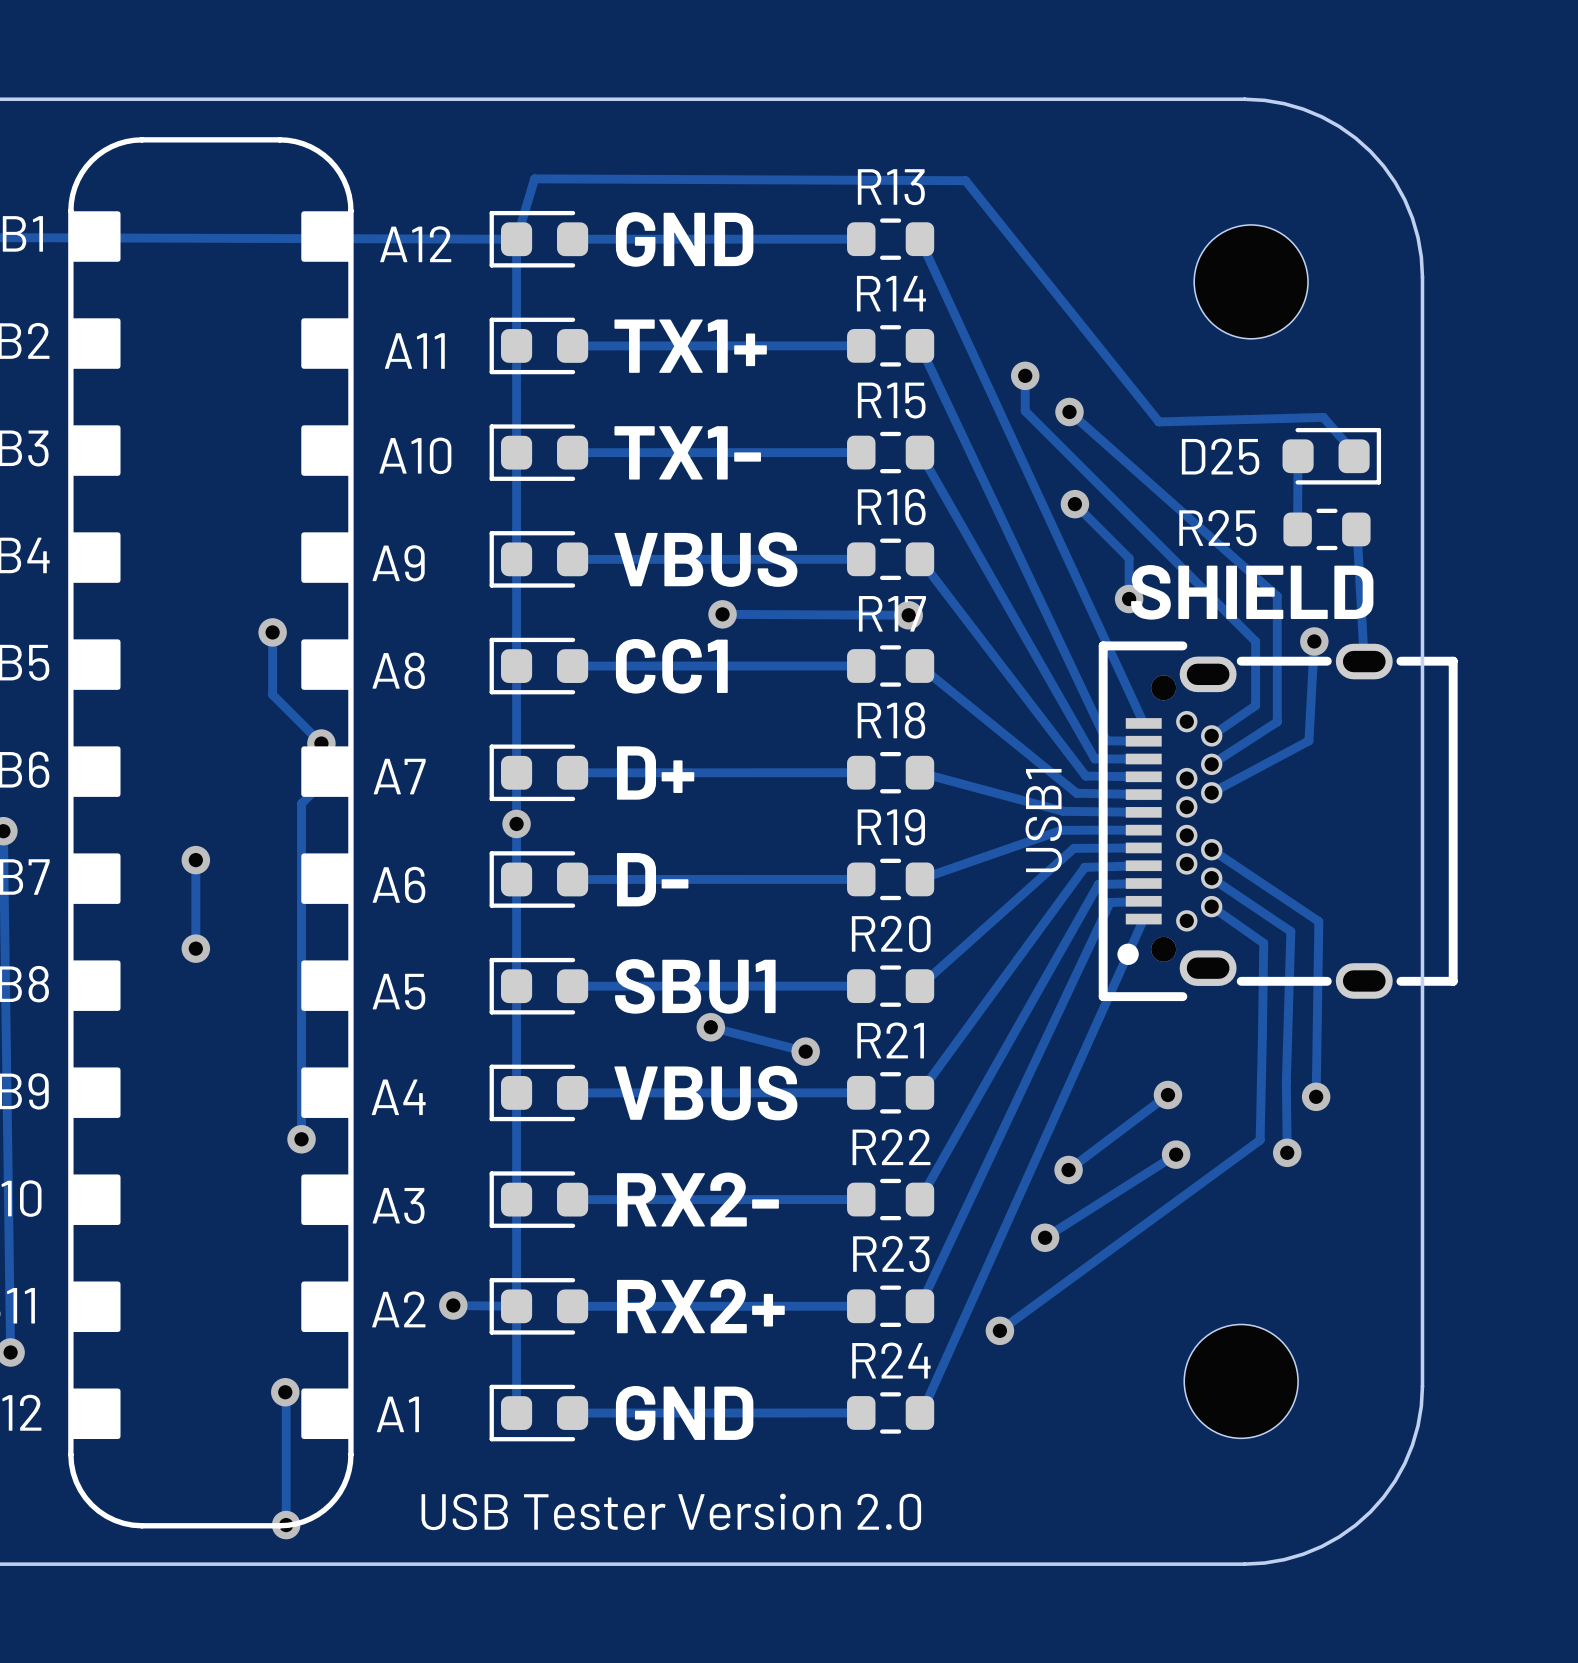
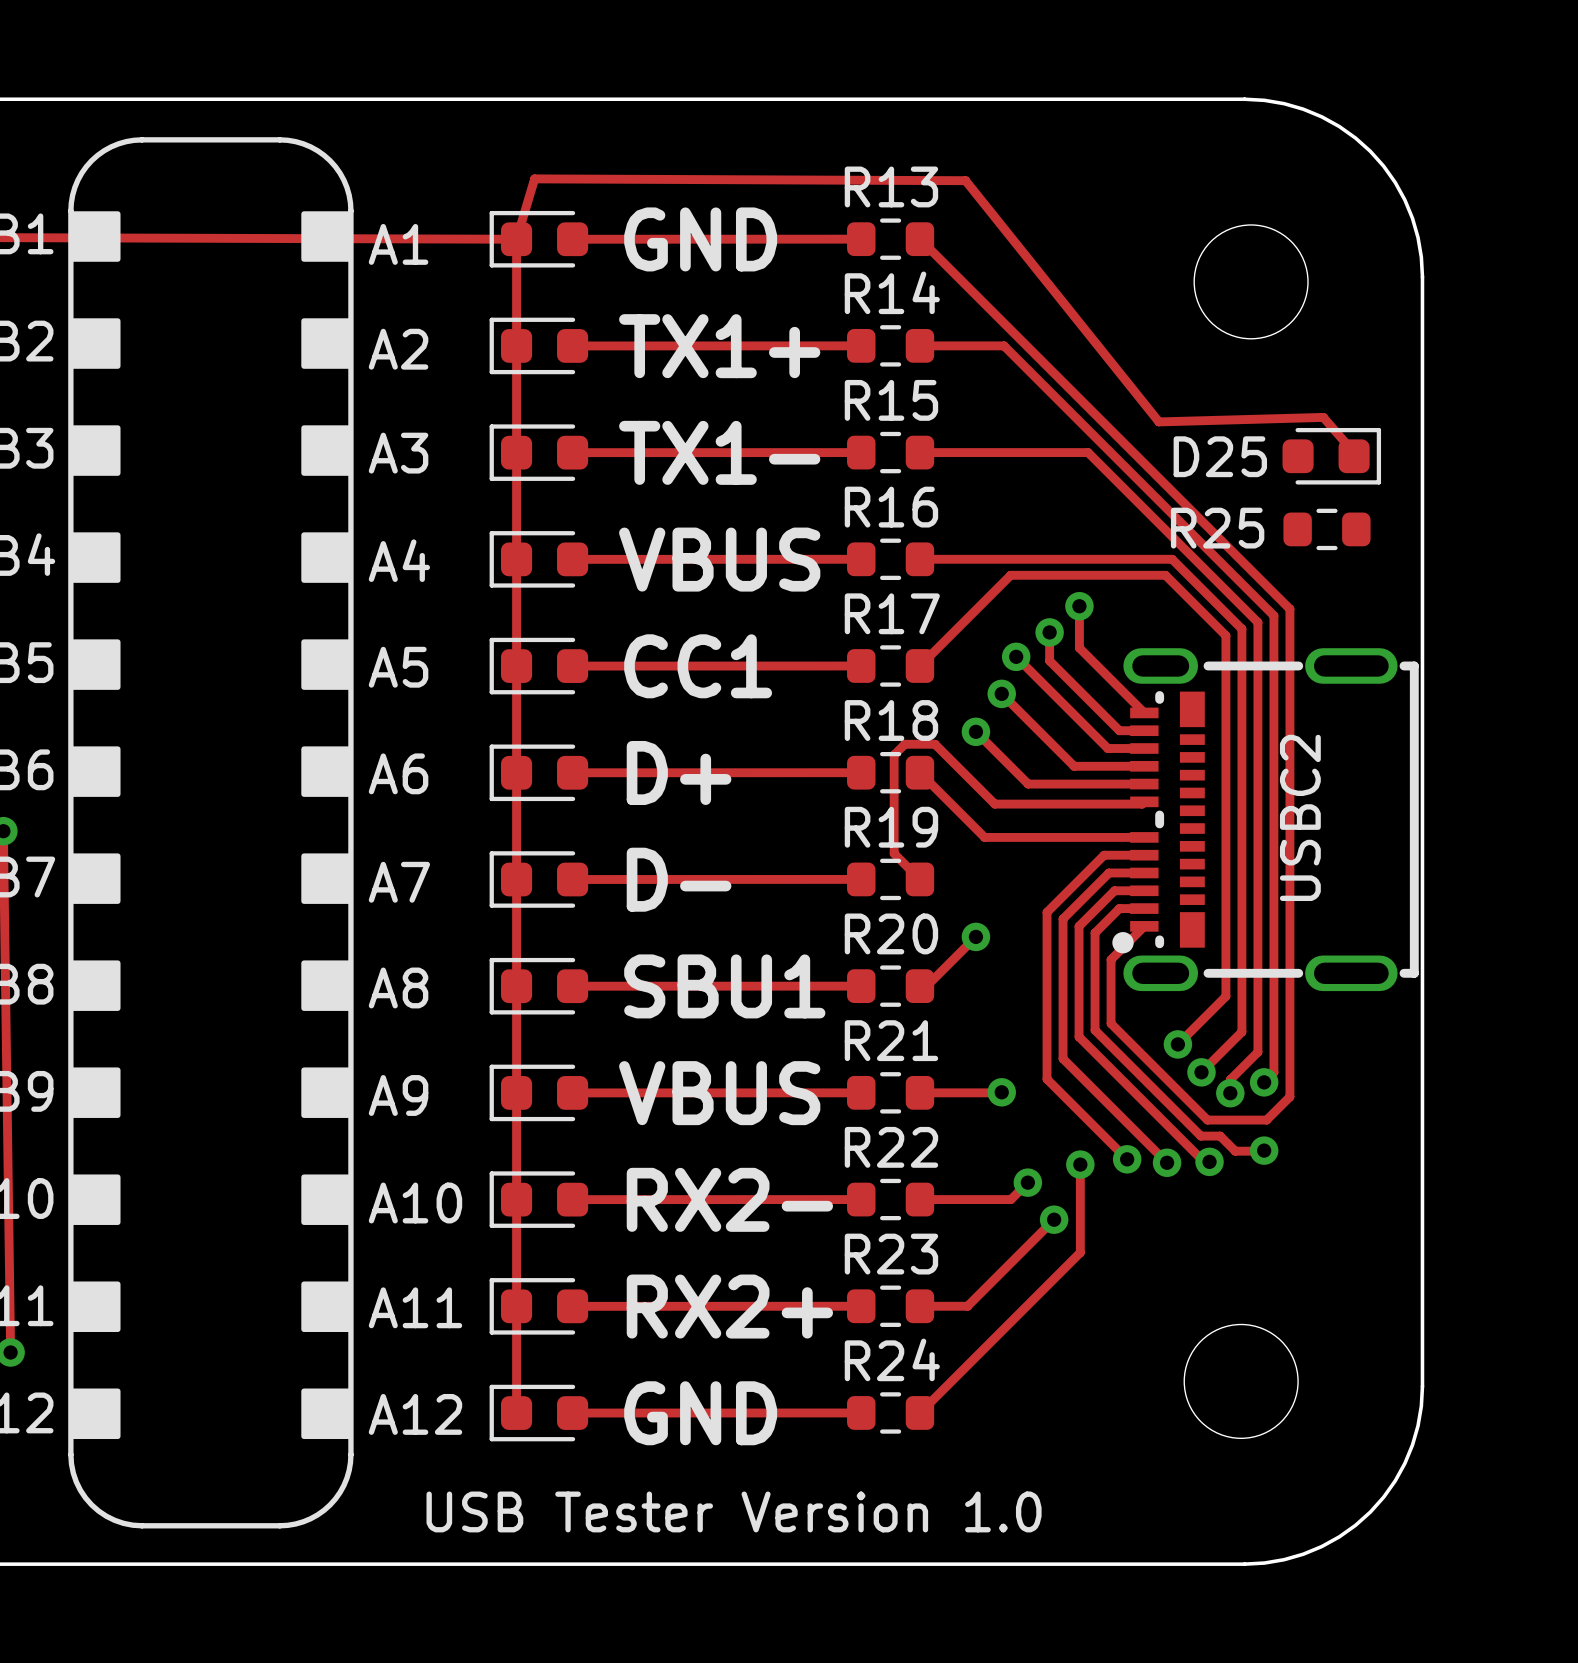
track: (919, 239) (1143, 723) -> (919, 239) (1289, 609) (1289, 1096) (1266, 1120) (1207, 1120) (1111, 1023) (1111, 959) (1144, 926)
A12 name position: A12 (415, 244) -> A12 (415, 1414)
track: (919, 345) (1106, 740) (1143, 741) -> (919, 345) (1004, 345) (1273, 615) (1273, 1072) (1264, 1082)
A11 name position: A11 (414, 351) -> A11 (415, 1307)
track: (1025, 375) (1025, 411) (1255, 641) (1255, 705) (1211, 735) -> none
via: (1025, 375) -> none
track: (1069, 411) (1277, 596) (1277, 721) (1211, 764) -> none
via: (1069, 411) -> none
track: (919, 452) (1094, 758) (1143, 759) -> (919, 452) (1088, 452) (1257, 622) (1257, 1052) (1230, 1079) (1230, 1093)
track: (1298, 452) (1297, 517) -> none
A10 name position: A10 (415, 455) -> A10 (415, 1203)
track: (1074, 504) (1129, 558) (1129, 599) -> none
via: (1074, 504) -> none
track: (1356, 517) (1364, 661) -> none
track: (919, 559) (1085, 776) (1143, 776) -> (919, 559) (1172, 559) (1241, 629) (1241, 1031) (1201, 1072)
A9 name position: A9 (398, 563) -> A9 (398, 1095)
text: SHIELD (1252, 592) -> none
via: (1129, 599) -> none
track: none -> (1079, 606) (1079, 648) (1144, 712)
via: none -> (1079, 606)
track: (722, 614) (908, 615) -> none
via: (722, 614) -> none
via: (908, 615) -> none
track: (272, 632) (272, 694) (321, 743) -> none
via: (272, 632) -> none
track: none -> (1049, 632) (1049, 660) (1119, 730) (1144, 730)
via: none -> (1049, 632)
track: (1314, 641) (1308, 740) (1211, 792) -> none
via: (1314, 641) -> none
track: none -> (1016, 656) (1107, 748) (1144, 748)
via: none -> (1016, 656)
track: (919, 666) (1076, 793) (1143, 794) -> (919, 666) (1010, 575) (1165, 575) (1225, 635) (1225, 996) (1177, 1044)
A8 name position: A8 (398, 670) -> A8 (398, 987)
track: none -> (1001, 693) (1074, 766) (1144, 766)
via: none -> (1001, 693)
track: none -> (975, 731) (1028, 784) (1144, 784)
via: none -> (975, 731)
via: (321, 743) -> none
track: (919, 772) (1063, 811) (1143, 812) -> (919, 772) (984, 837) (1144, 837)
A7 name position: A7 (399, 776) -> A7 (399, 882)
track: (325, 780) (301, 803) (301, 1139) -> none
USBC2: none -> (1265, 819)
USB1: (1278, 821) -> none
via: (516, 823) -> none
track: (1143, 830) (1061, 830) (919, 879) -> (1144, 801) (1142, 804) (994, 804) (935, 744) (904, 744) (894, 754) (894, 853) (919, 879)
track: (1143, 847) (1074, 848) (919, 986) -> (975, 936) (926, 986) (919, 986)
track: (1211, 849) (1318, 921) (1316, 1096) -> none
track: none -> (1144, 855) (1104, 855) (1047, 912) (1047, 1079) (1127, 1159)
track: (195, 860) (195, 948) -> none
via: (195, 860) -> none
track: (1143, 865) (1084, 867) (919, 1092) -> (1001, 1092) (919, 1092)
track: none -> (1144, 873) (1109, 873) (1063, 918) (1063, 1058) (1167, 1162)
track: (1211, 878) (1290, 931) (1286, 1082) (1287, 1152) -> none
track: (1143, 883) (1098, 884) (919, 1199) -> (1027, 1182) (1010, 1199) (919, 1199)
A6 name position: A6 (398, 884) -> A6 (398, 773)
track: none -> (1144, 890) (1114, 890) (1079, 926) (1079, 1036) (1204, 1161) (1209, 1161)
track: (1143, 901) (1110, 902) (919, 1306) -> (1054, 1219) (967, 1306) (919, 1306)
track: (1211, 906) (1263, 943) (1260, 1140) (999, 1330) -> none
track: none -> (1144, 908) (1119, 908) (1095, 932) (1095, 1030) (1200, 1136) (1220, 1136) (1235, 1151) (1264, 1150)
track: (1143, 919) (924, 1407) (919, 1412) -> (1080, 1164) (1080, 1252) (919, 1412)
via: none -> (975, 936)
via: (195, 948) -> none
A5 name position: A5 (398, 991) -> A5 (398, 667)
track: (710, 1027) (805, 1051) -> none
via: (710, 1027) -> none
via: none -> (1177, 1044)
via: (805, 1051) -> none
via: none -> (1201, 1072)
via: none -> (1264, 1082)
via: none -> (1001, 1092)
via: none -> (1230, 1093)
track: (1167, 1095) (1068, 1170) -> none
via: (1167, 1095) -> none
via: (1316, 1096) -> none
A4 name position: A4 (398, 1097) -> A4 (399, 560)
via: (301, 1139) -> none
via position: (1287, 1152) -> (1264, 1150)
track: (1176, 1154) (1045, 1237) -> none
via position: (1176, 1154) -> (1167, 1162)
via: none -> (1127, 1159)
via: none -> (1209, 1161)
via position: (1068, 1170) -> (1080, 1164)
via: none -> (1027, 1182)
A3 name position: A3 (398, 1205) -> A3 (398, 453)
via position: (1045, 1237) -> (1054, 1219)
track: (453, 1305) (516, 1306) -> none
via: (453, 1305) -> none
A2 name position: A2 (398, 1309) -> A2 (398, 349)
via: (999, 1330) -> none
track: (285, 1392) (286, 1525) -> none
via: (285, 1392) -> none
A1 name position: A1 (397, 1414) -> A1 (398, 244)
text: USB Tester Version 2.0 (671, 1511) -> USB Tester Version 1.0 (734, 1511)
via: (286, 1525) -> none

